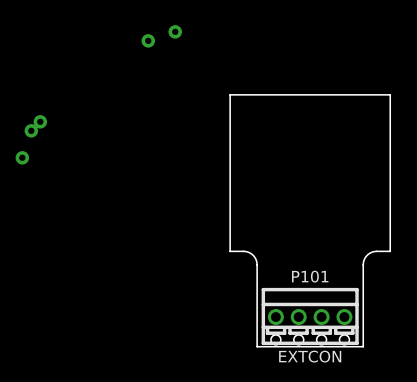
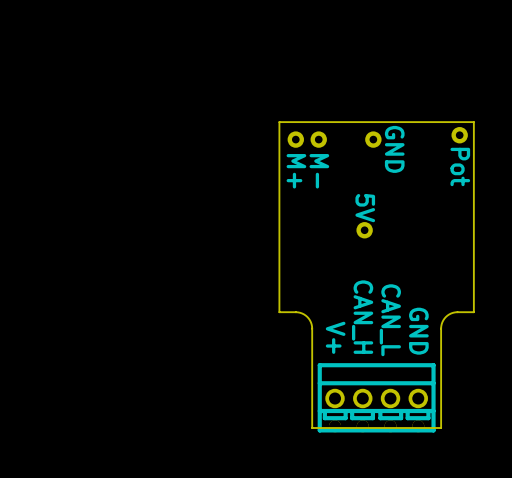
part position: (175, 31) -> (318, 139)
part position: (148, 40) -> (295, 139)
part: none -> Pot (459, 135)
part: none -> GND (373, 139)
part: (40, 121) -> none
part: (31, 130) -> none
part: (22, 157) -> none
part: none -> 5V (364, 230)
text: none -> CAN_H (362, 317)
text: none -> CAN_L (390, 320)
text: none -> GND (418, 331)
text: none -> V+ (335, 337)
P101: EXTCON (310, 316) -> none
part: none -> (376, 397)

